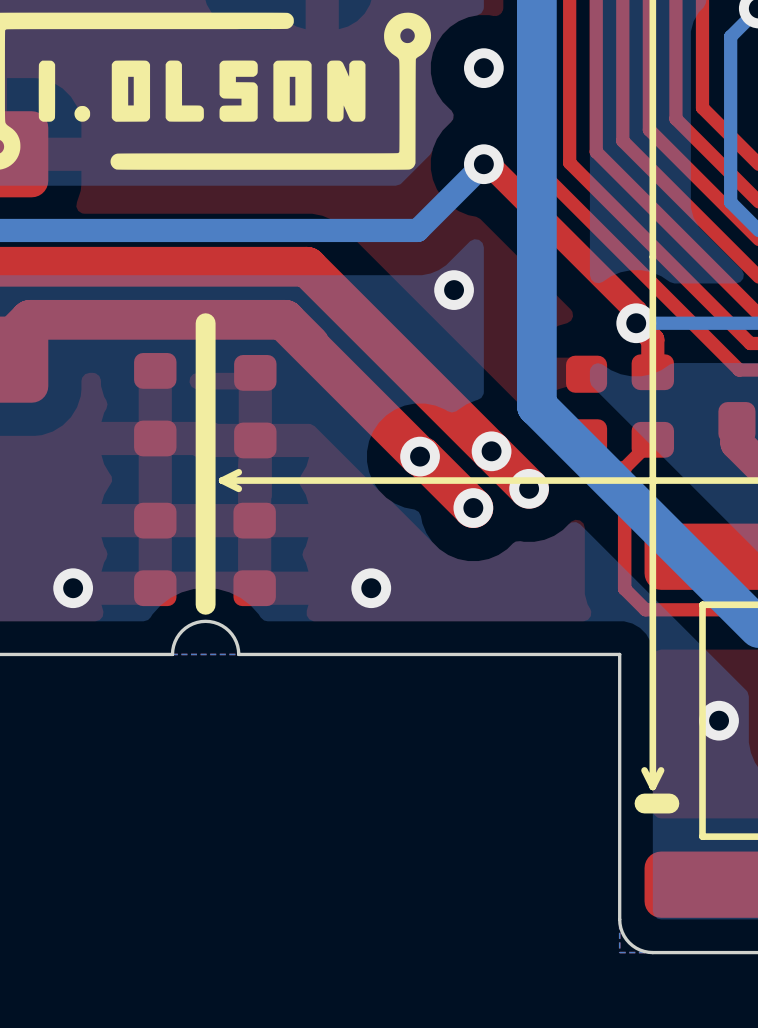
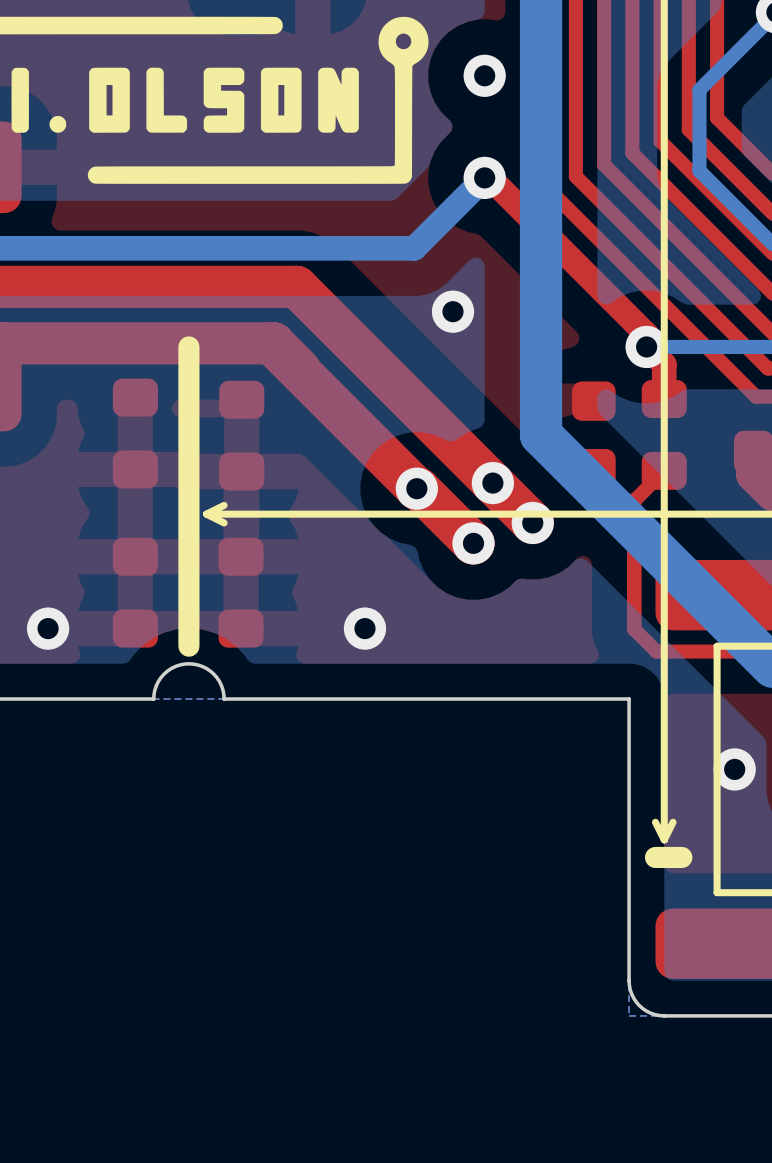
bottom track: (730, 36) (730, 202) -> (747, 42) (699, 89) (699, 170) (747, 218)

